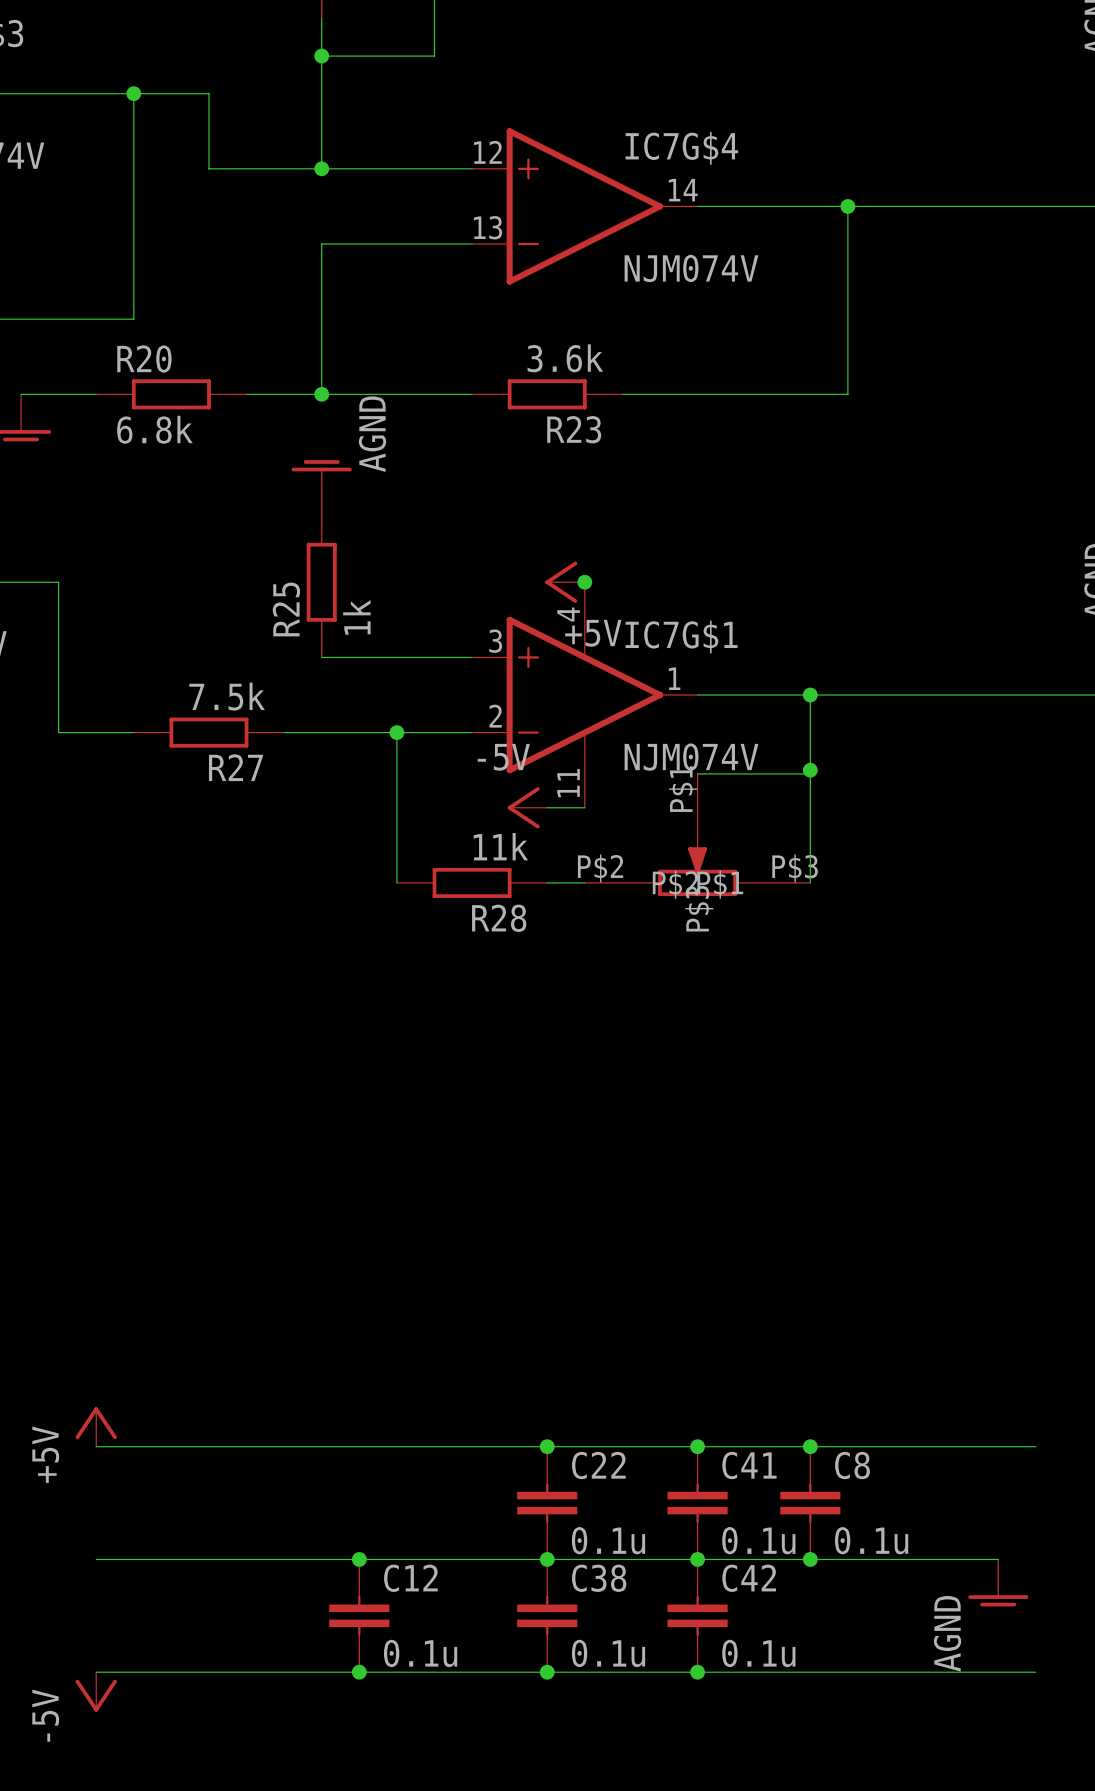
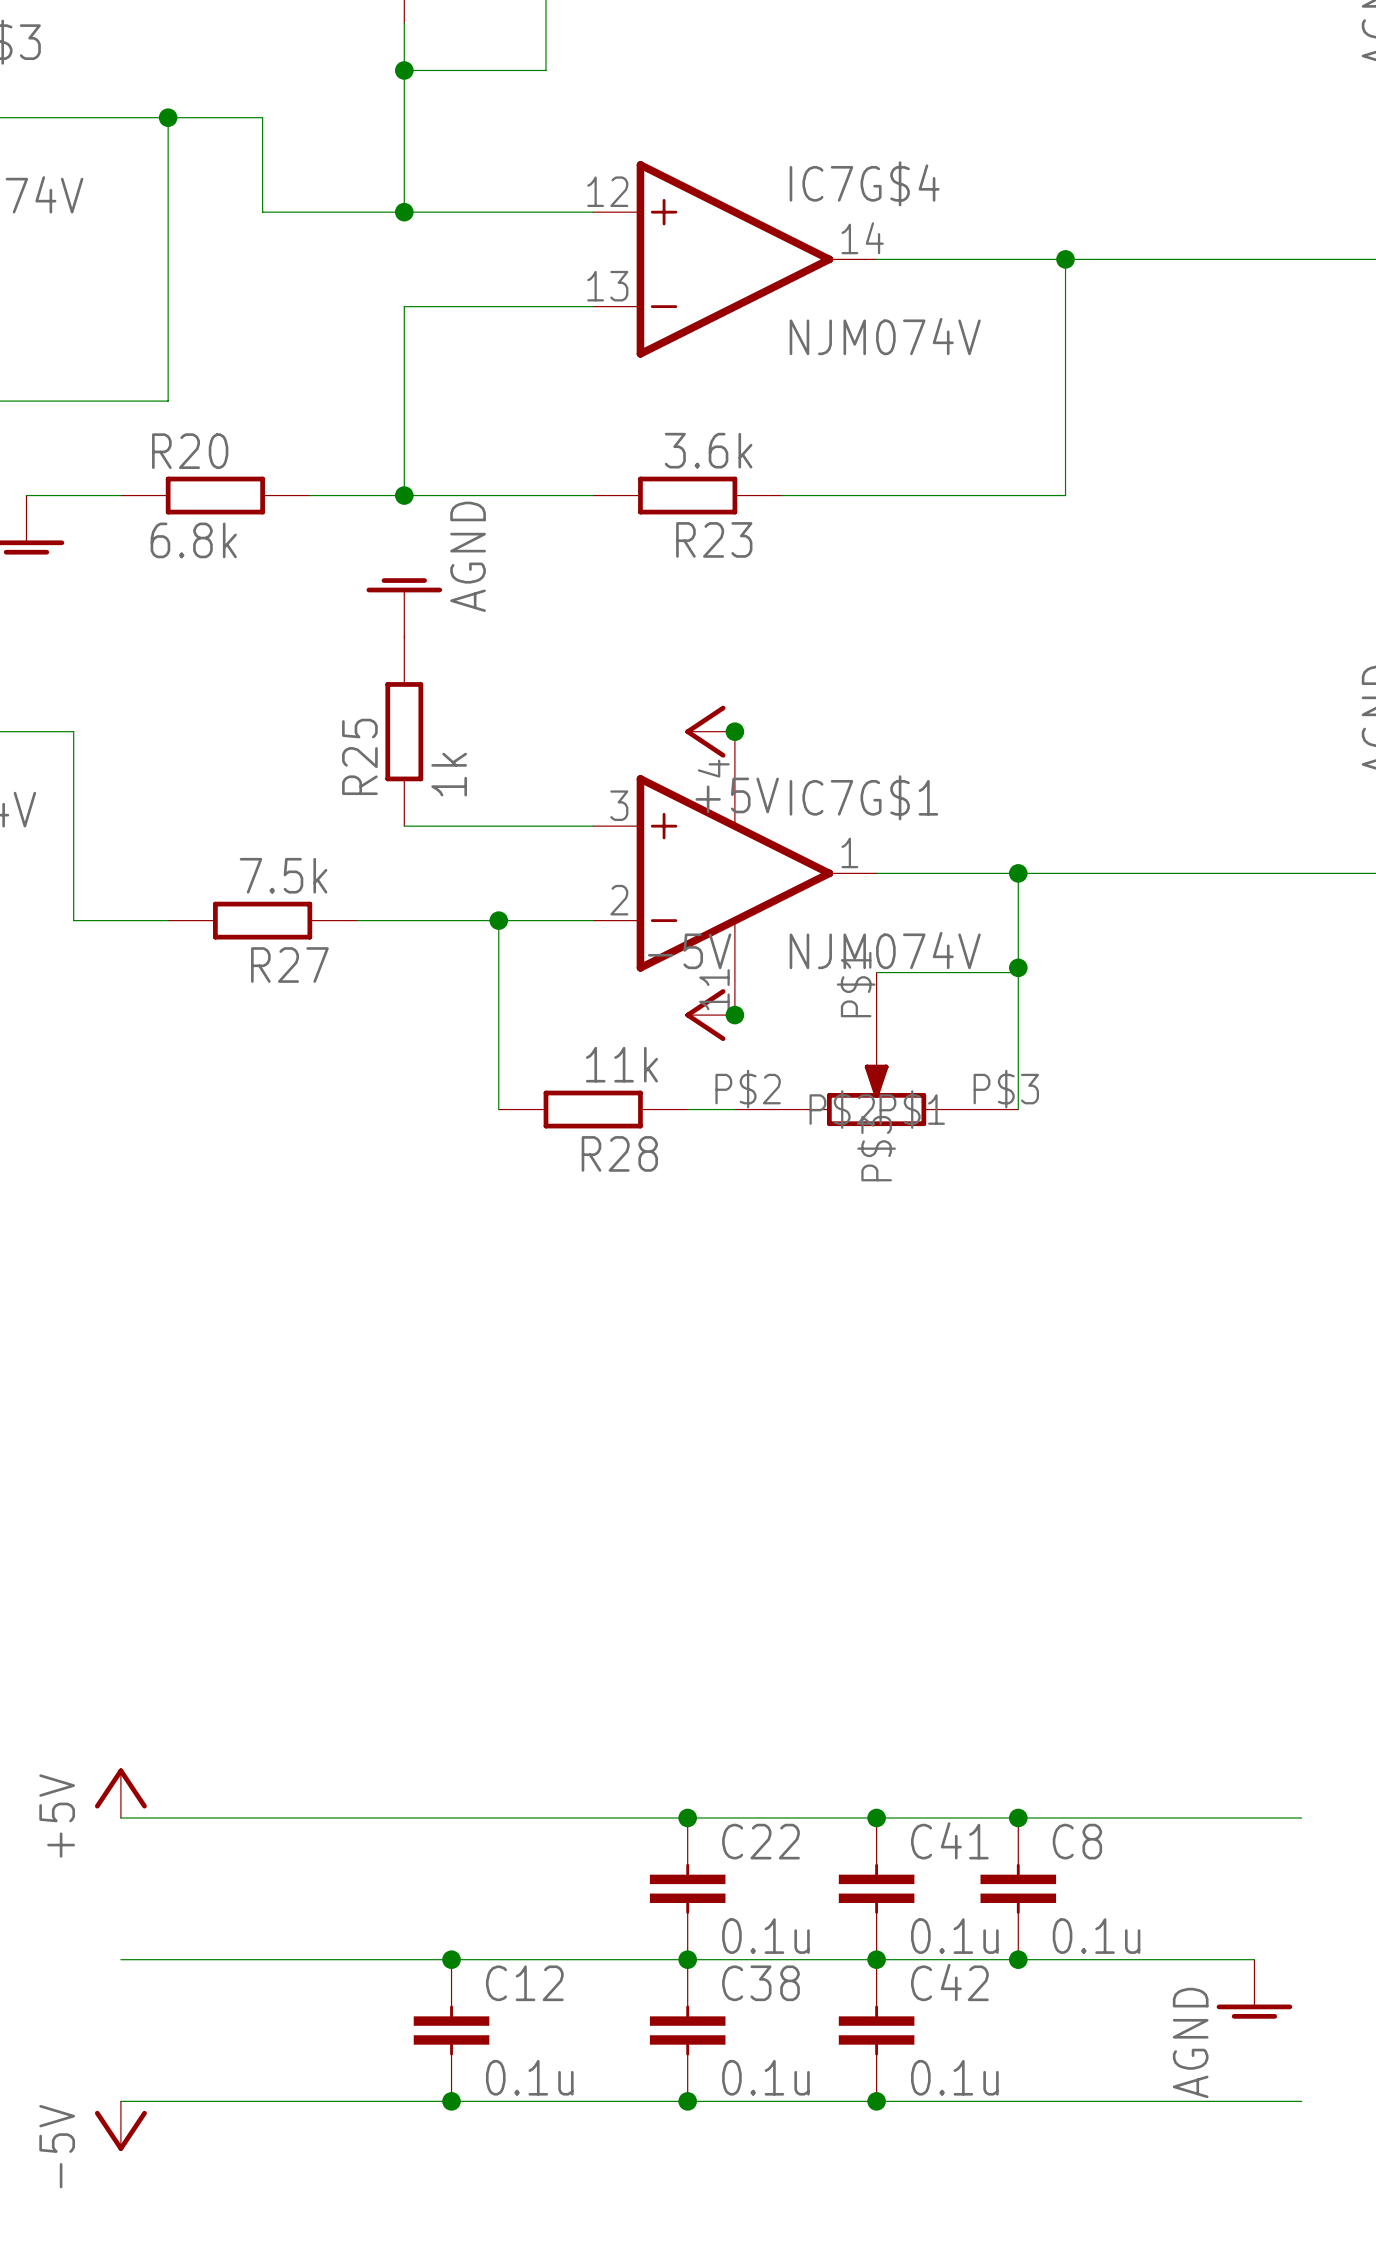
power symbol position: -5V (527, 807) -> -5V (710, 1015)
junction: none -> (734, 1015)

